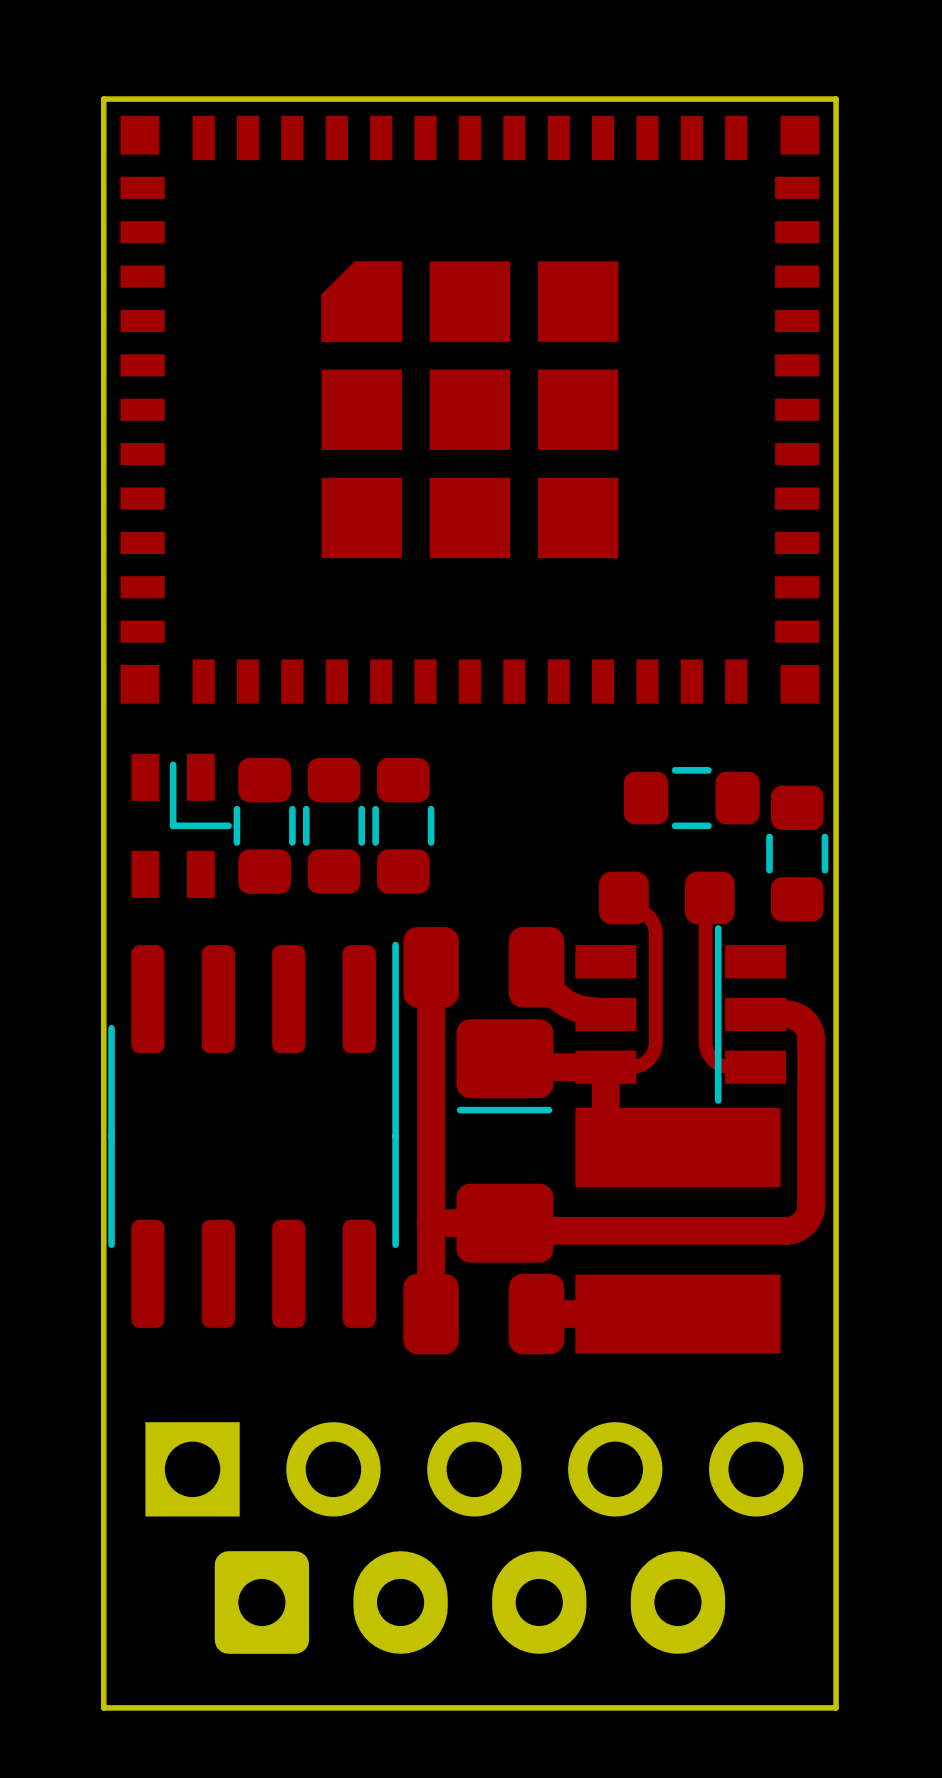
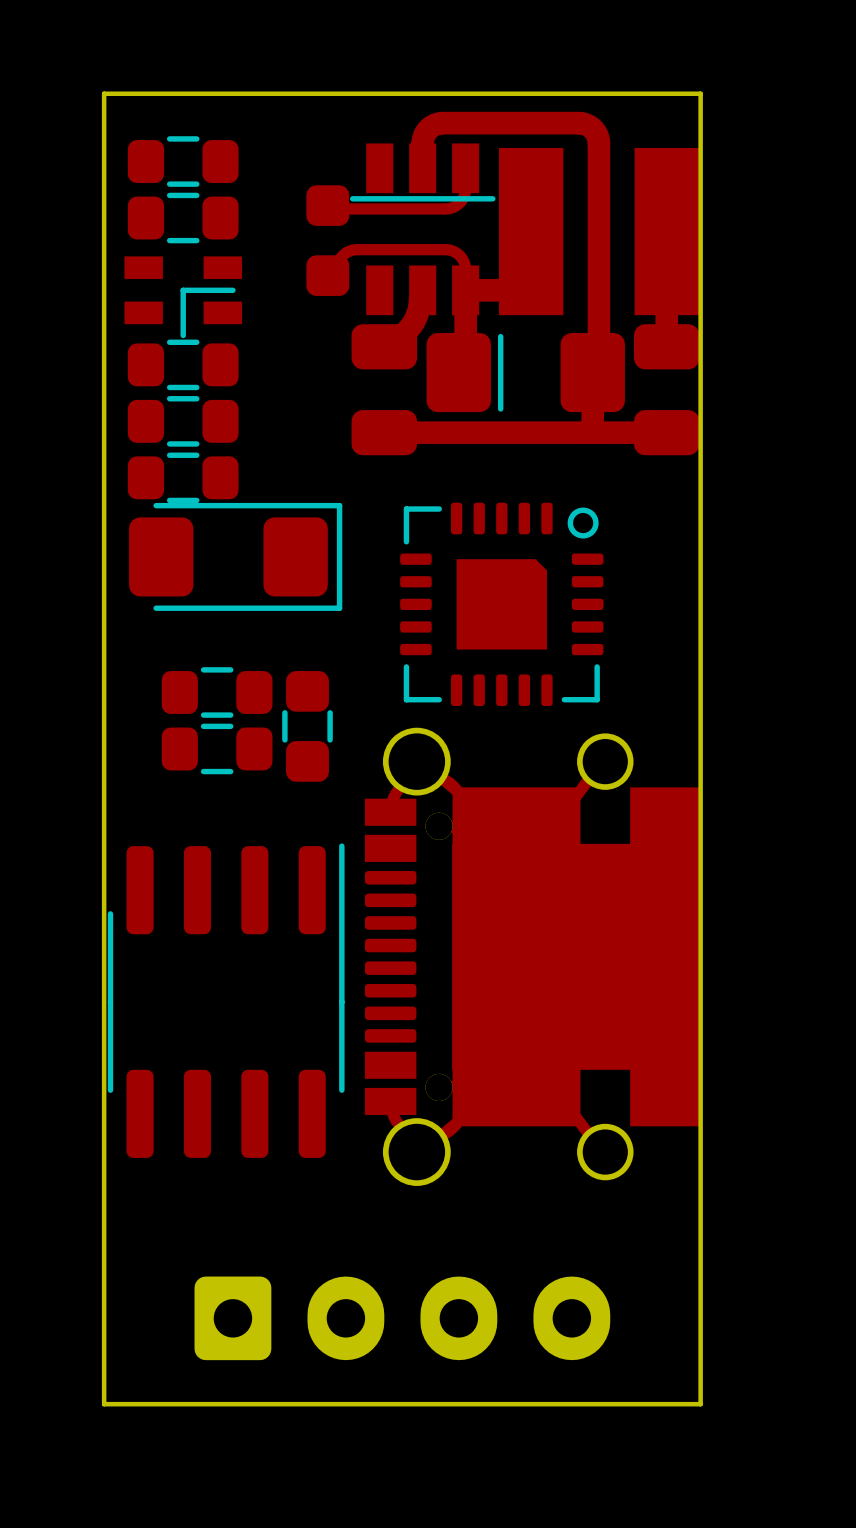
part: none -> (183, 161)
part: none -> (183, 218)
part: none -> (502, 283)
part: (469, 409) -> none
part: none -> (183, 364)
part: none -> (183, 421)
part: none -> (183, 477)
part: none -> (235, 556)
part: none -> (501, 604)
part: (691, 798) -> none
part rotation: 0° (181, 825) -> 90° clockwise (183, 297)
part position: (181, 825) -> (183, 297)
part rotation: 0° (264, 825) -> 90° clockwise (217, 692)
part: (334, 825) -> none
part: (403, 825) -> none
part: (797, 853) -> none
part footprint: [403, 871, 825, 1355] -> [364, 727, 701, 1186]
part: none -> (307, 726)
part: none -> (217, 748)
part position: (253, 1134) -> (226, 1000)
part: (474, 1469) -> none

